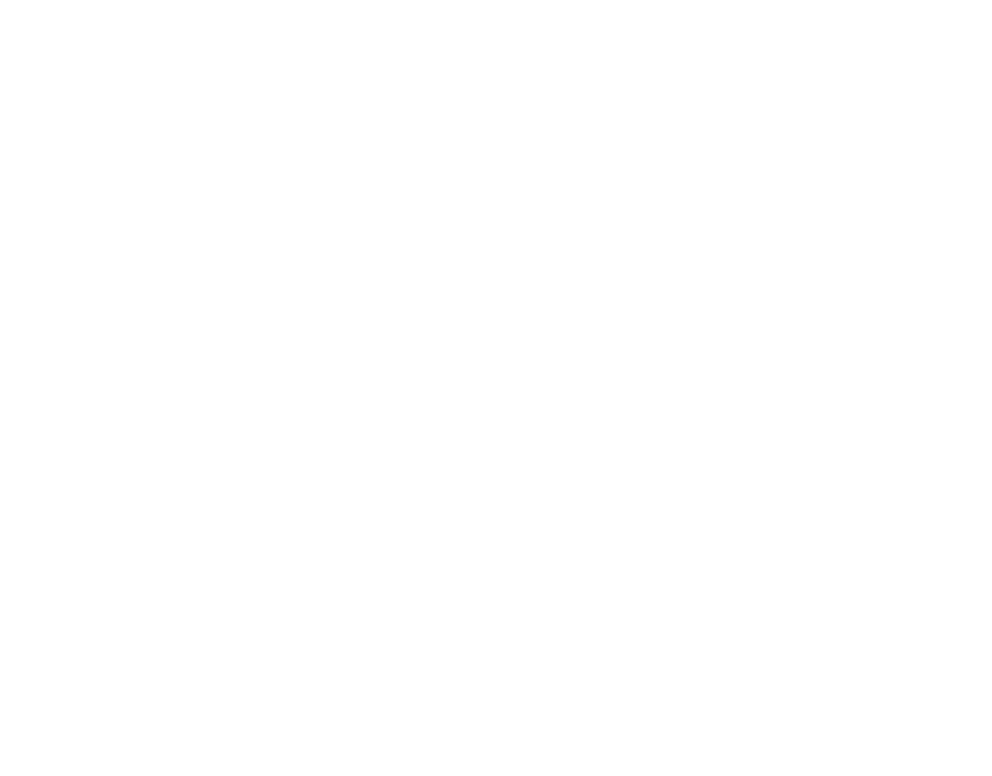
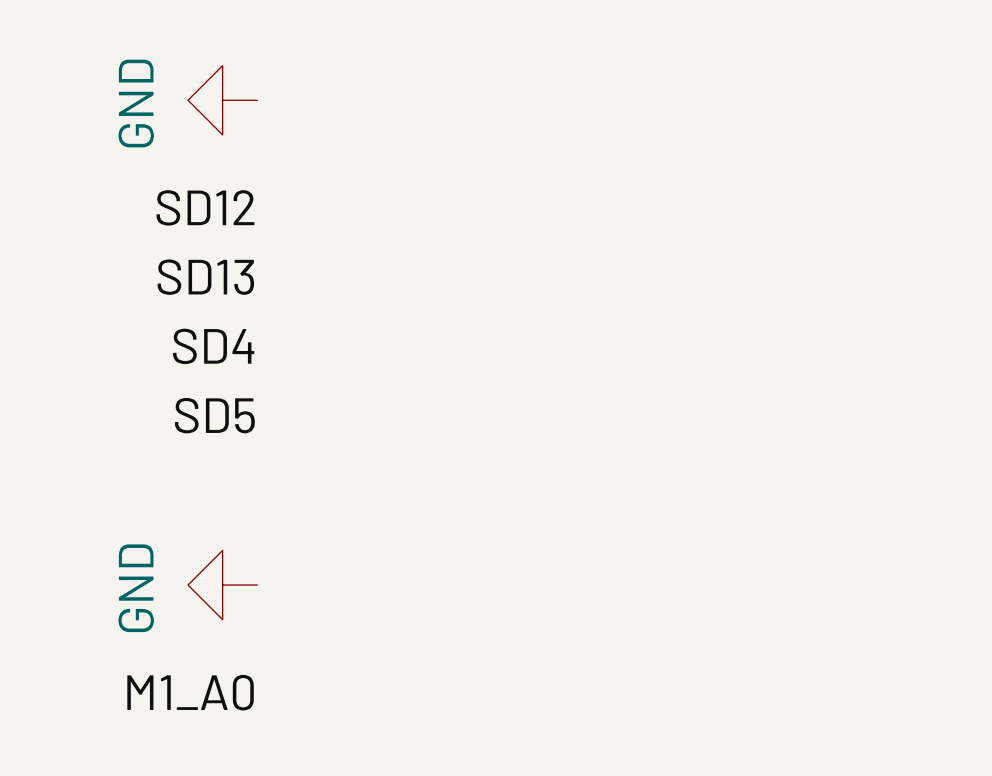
power symbol: none -> GND (222, 100)
label: none -> SD12 (205, 207)
label: none -> SD13 (205, 277)
label: none -> SD4 (213, 346)
label: none -> SD5 (214, 415)
power symbol: none -> GND (222, 585)
label: none -> M1_A0 (190, 692)

